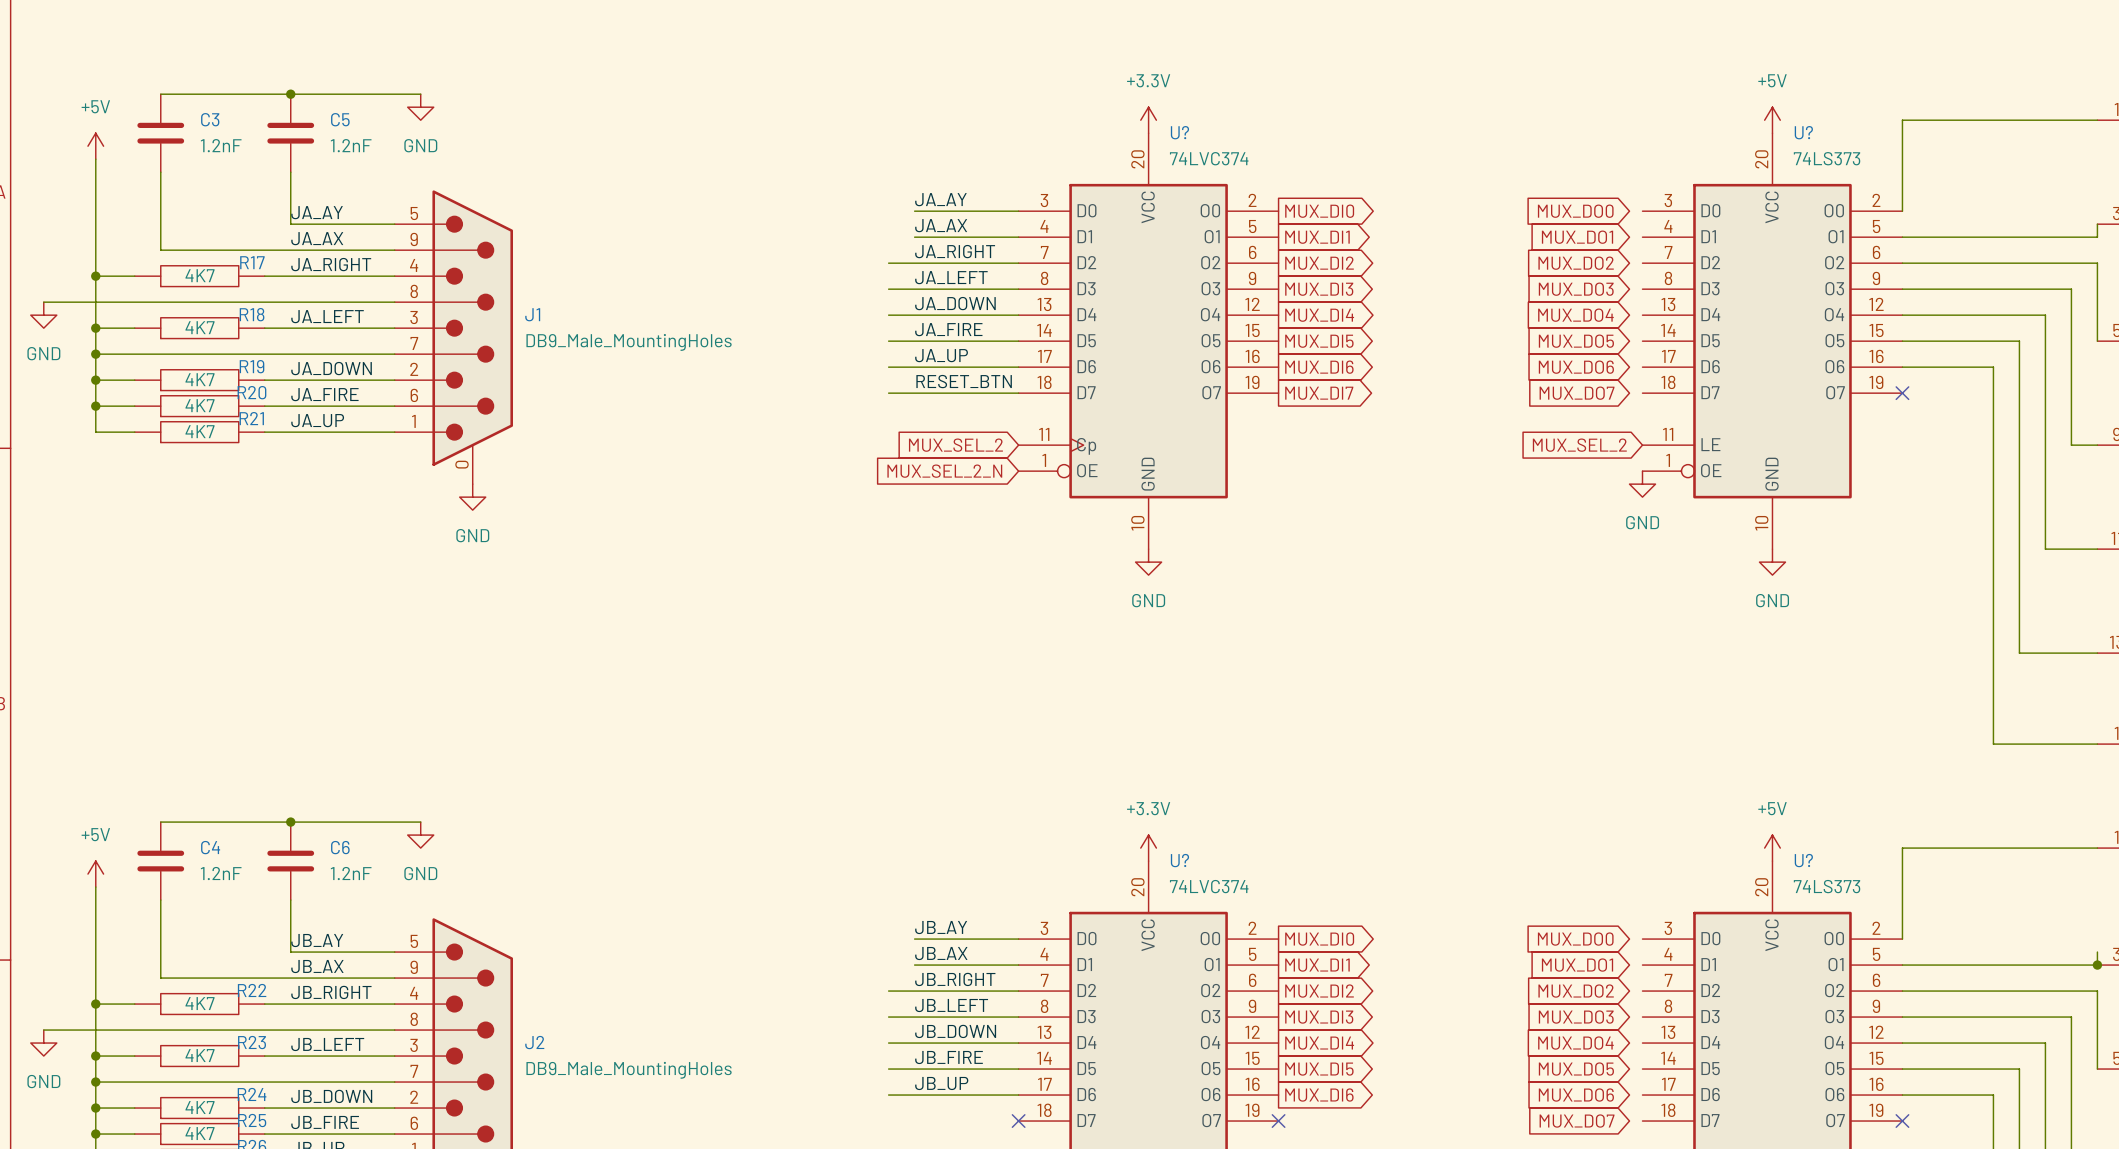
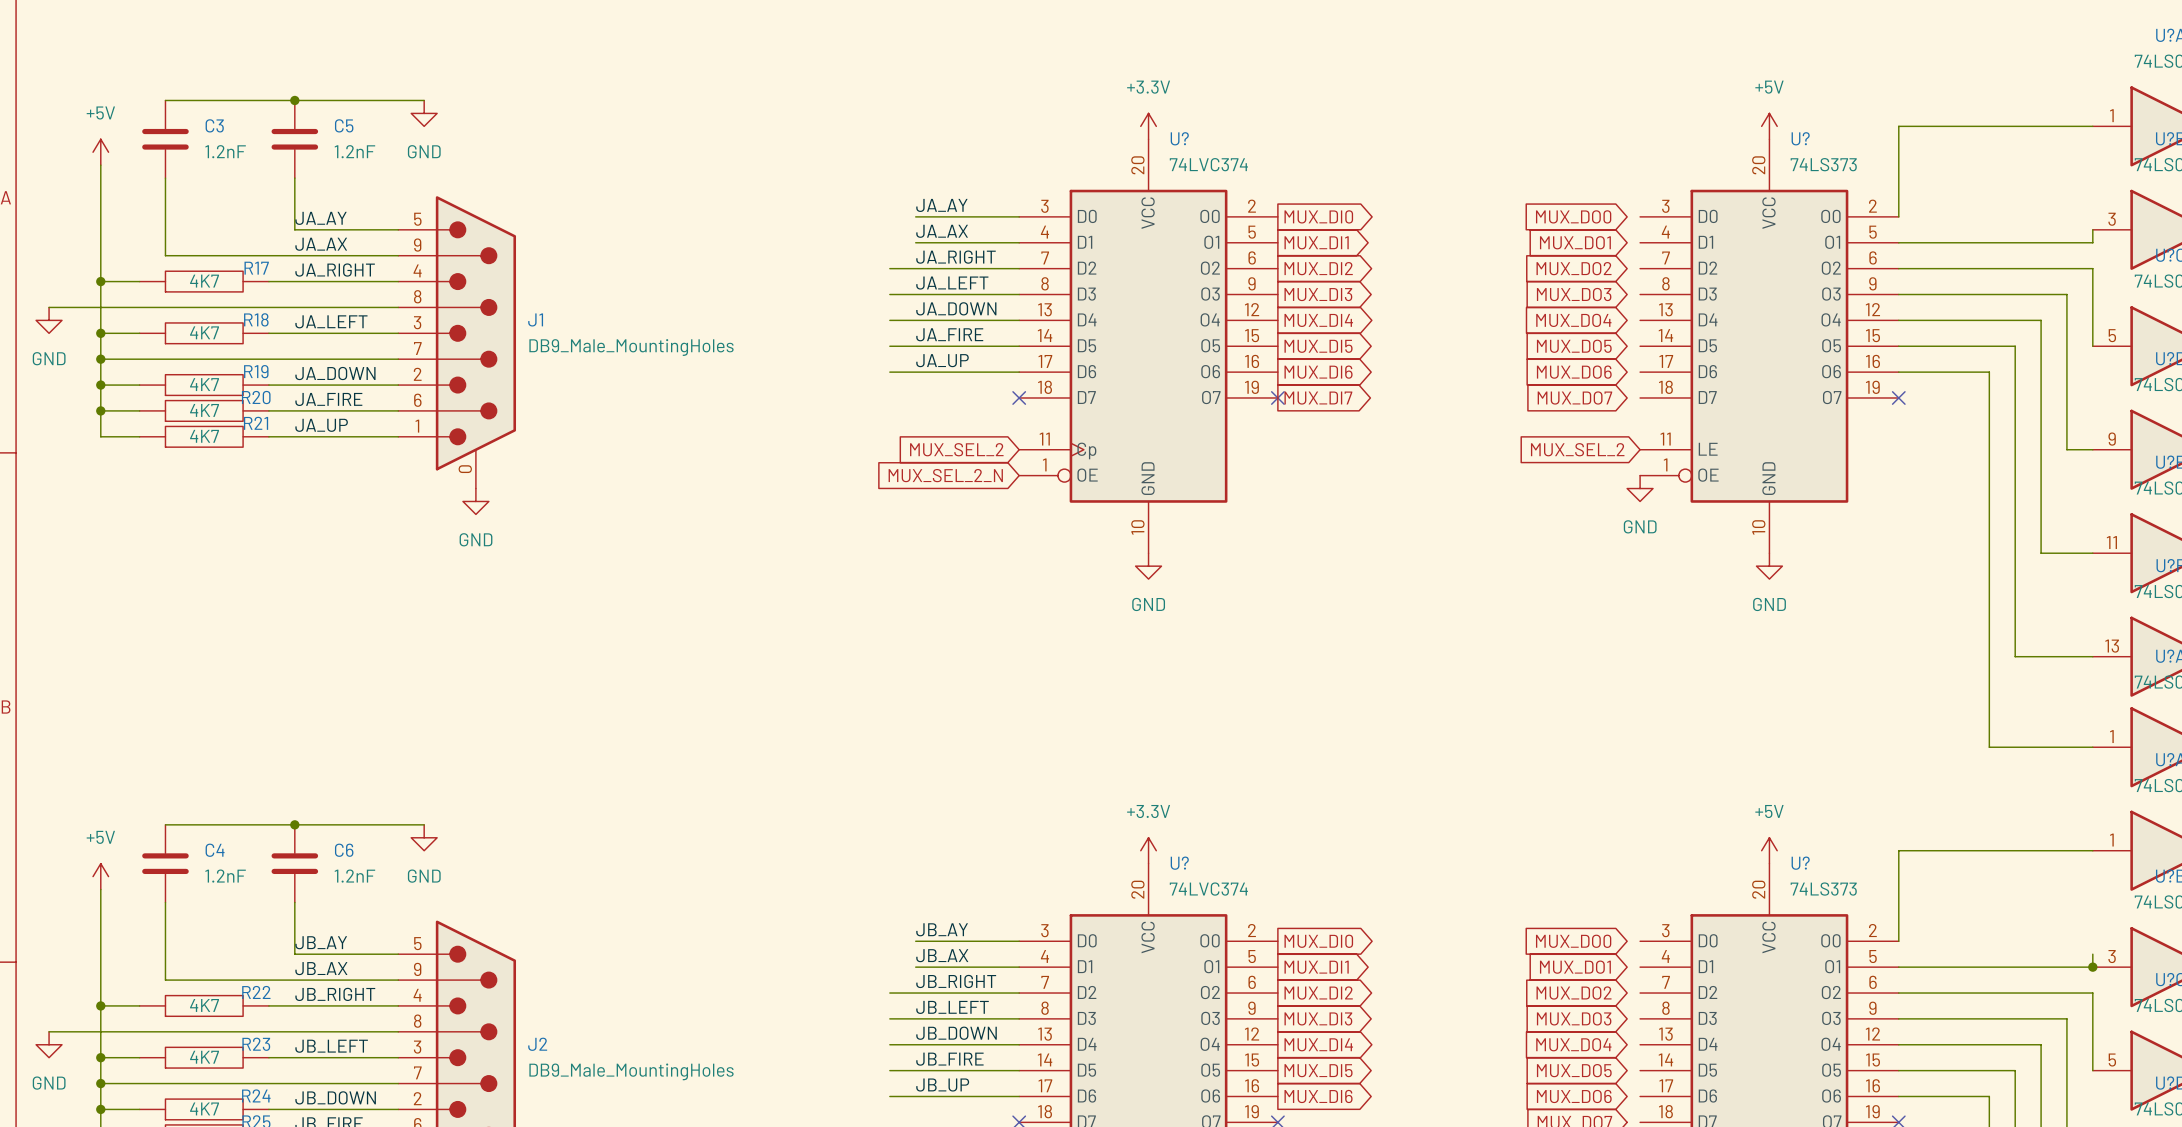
label: RESET_BTN (964, 381) -> none
wire: (888, 393) (1018, 393) -> none
no-connect mark: none -> (1019, 397)
no-connect mark: none -> (1277, 397)

